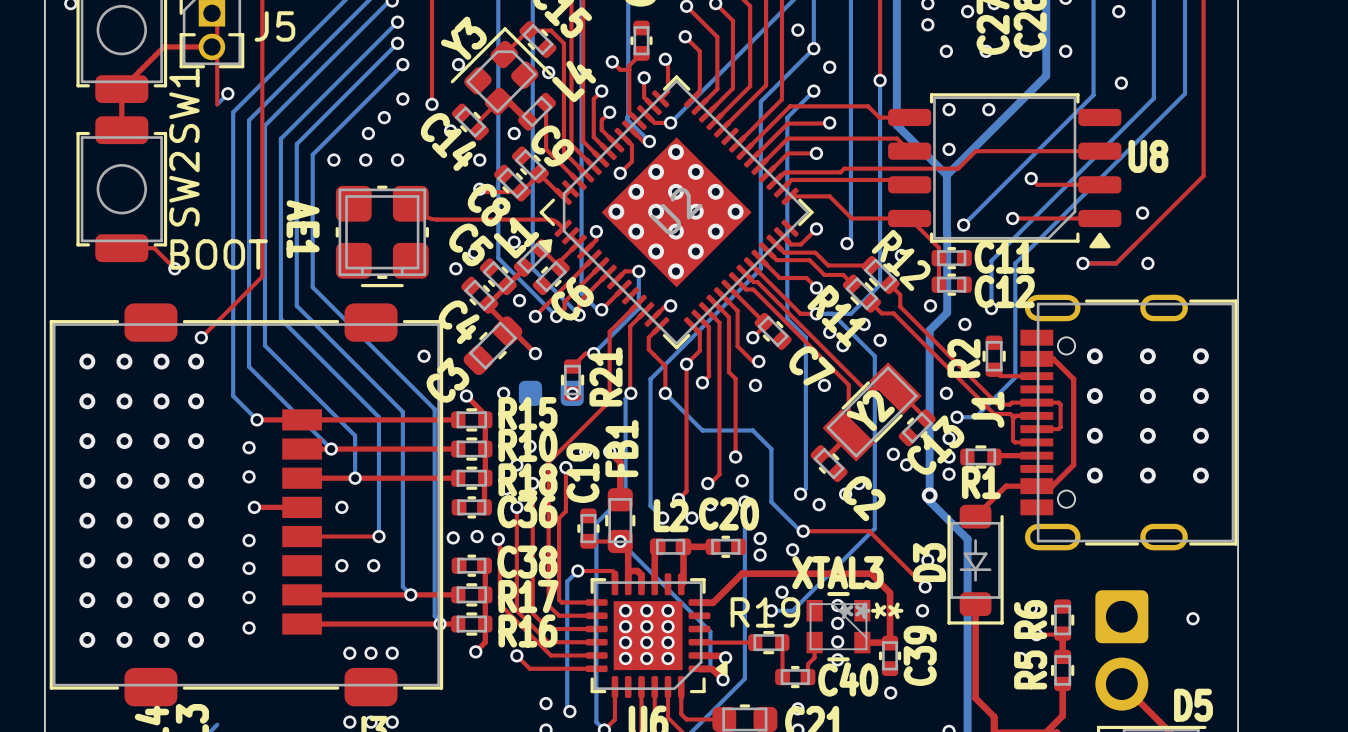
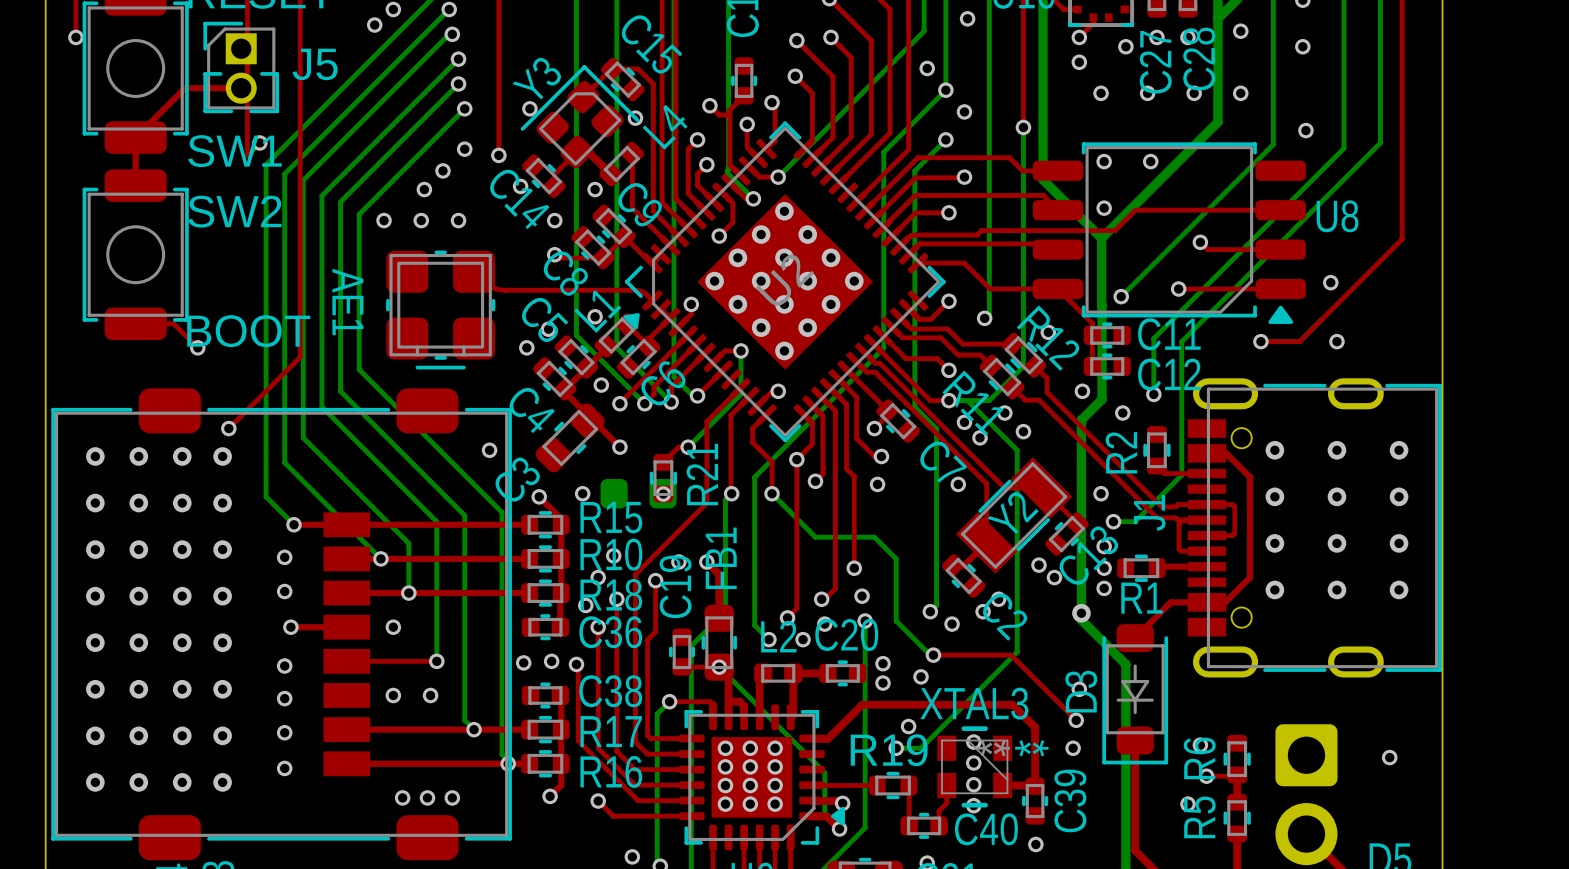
SW1 name rotation: 0° (184, 105) -> 90° clockwise (234, 151)
SW2 name rotation: 0° (184, 189) -> 90° clockwise (234, 211)

